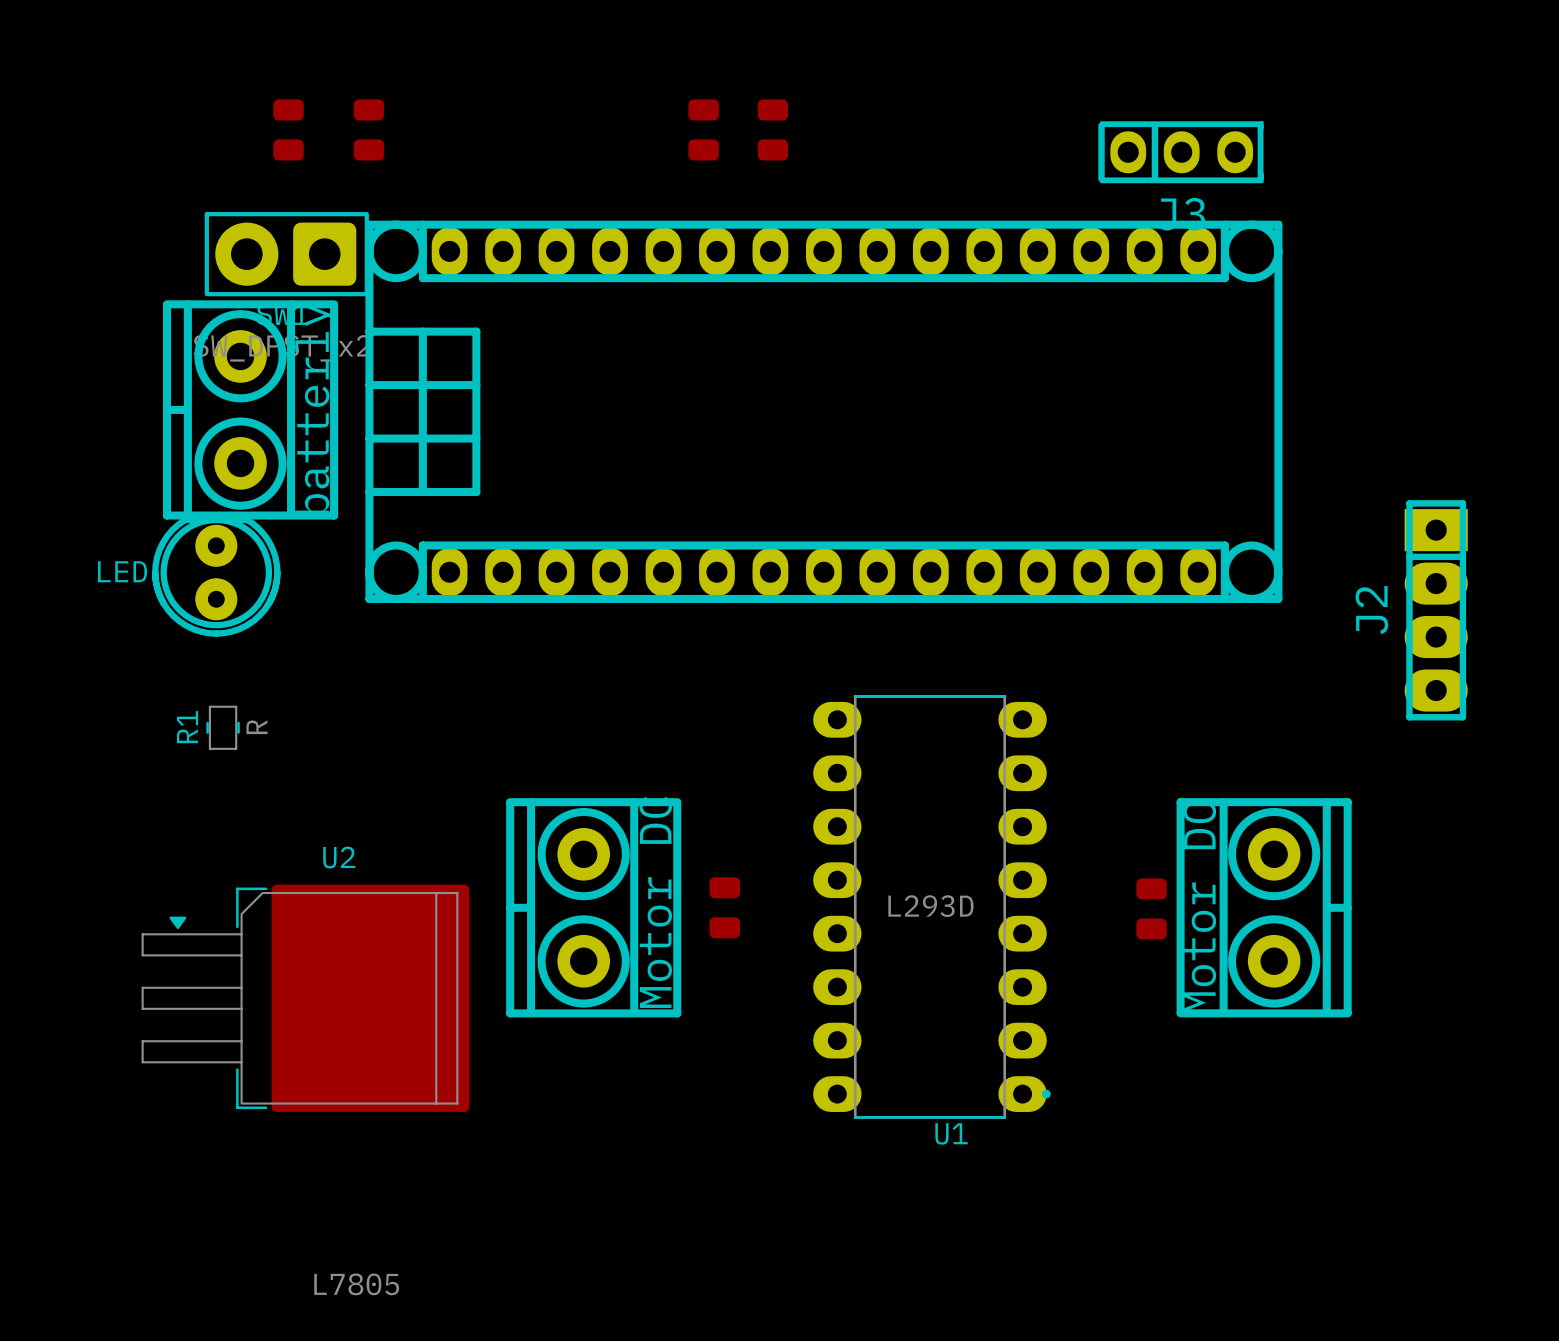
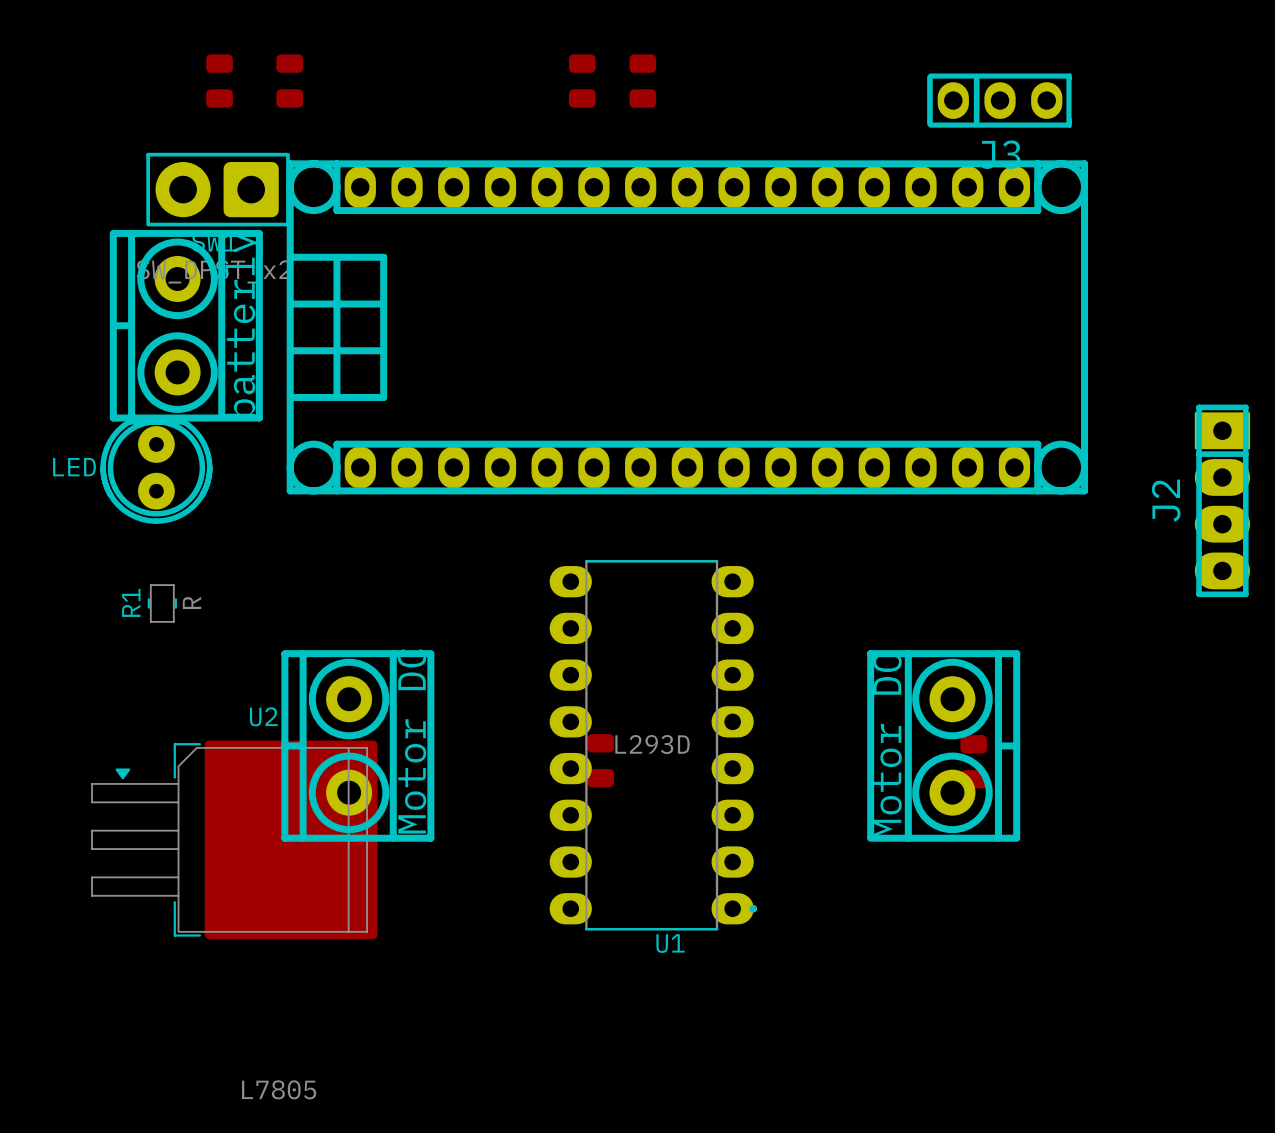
U1 position: (931, 906) -> (653, 745)
part position: (593, 907) -> (357, 745)
part position: (1264, 907) -> (943, 745)

